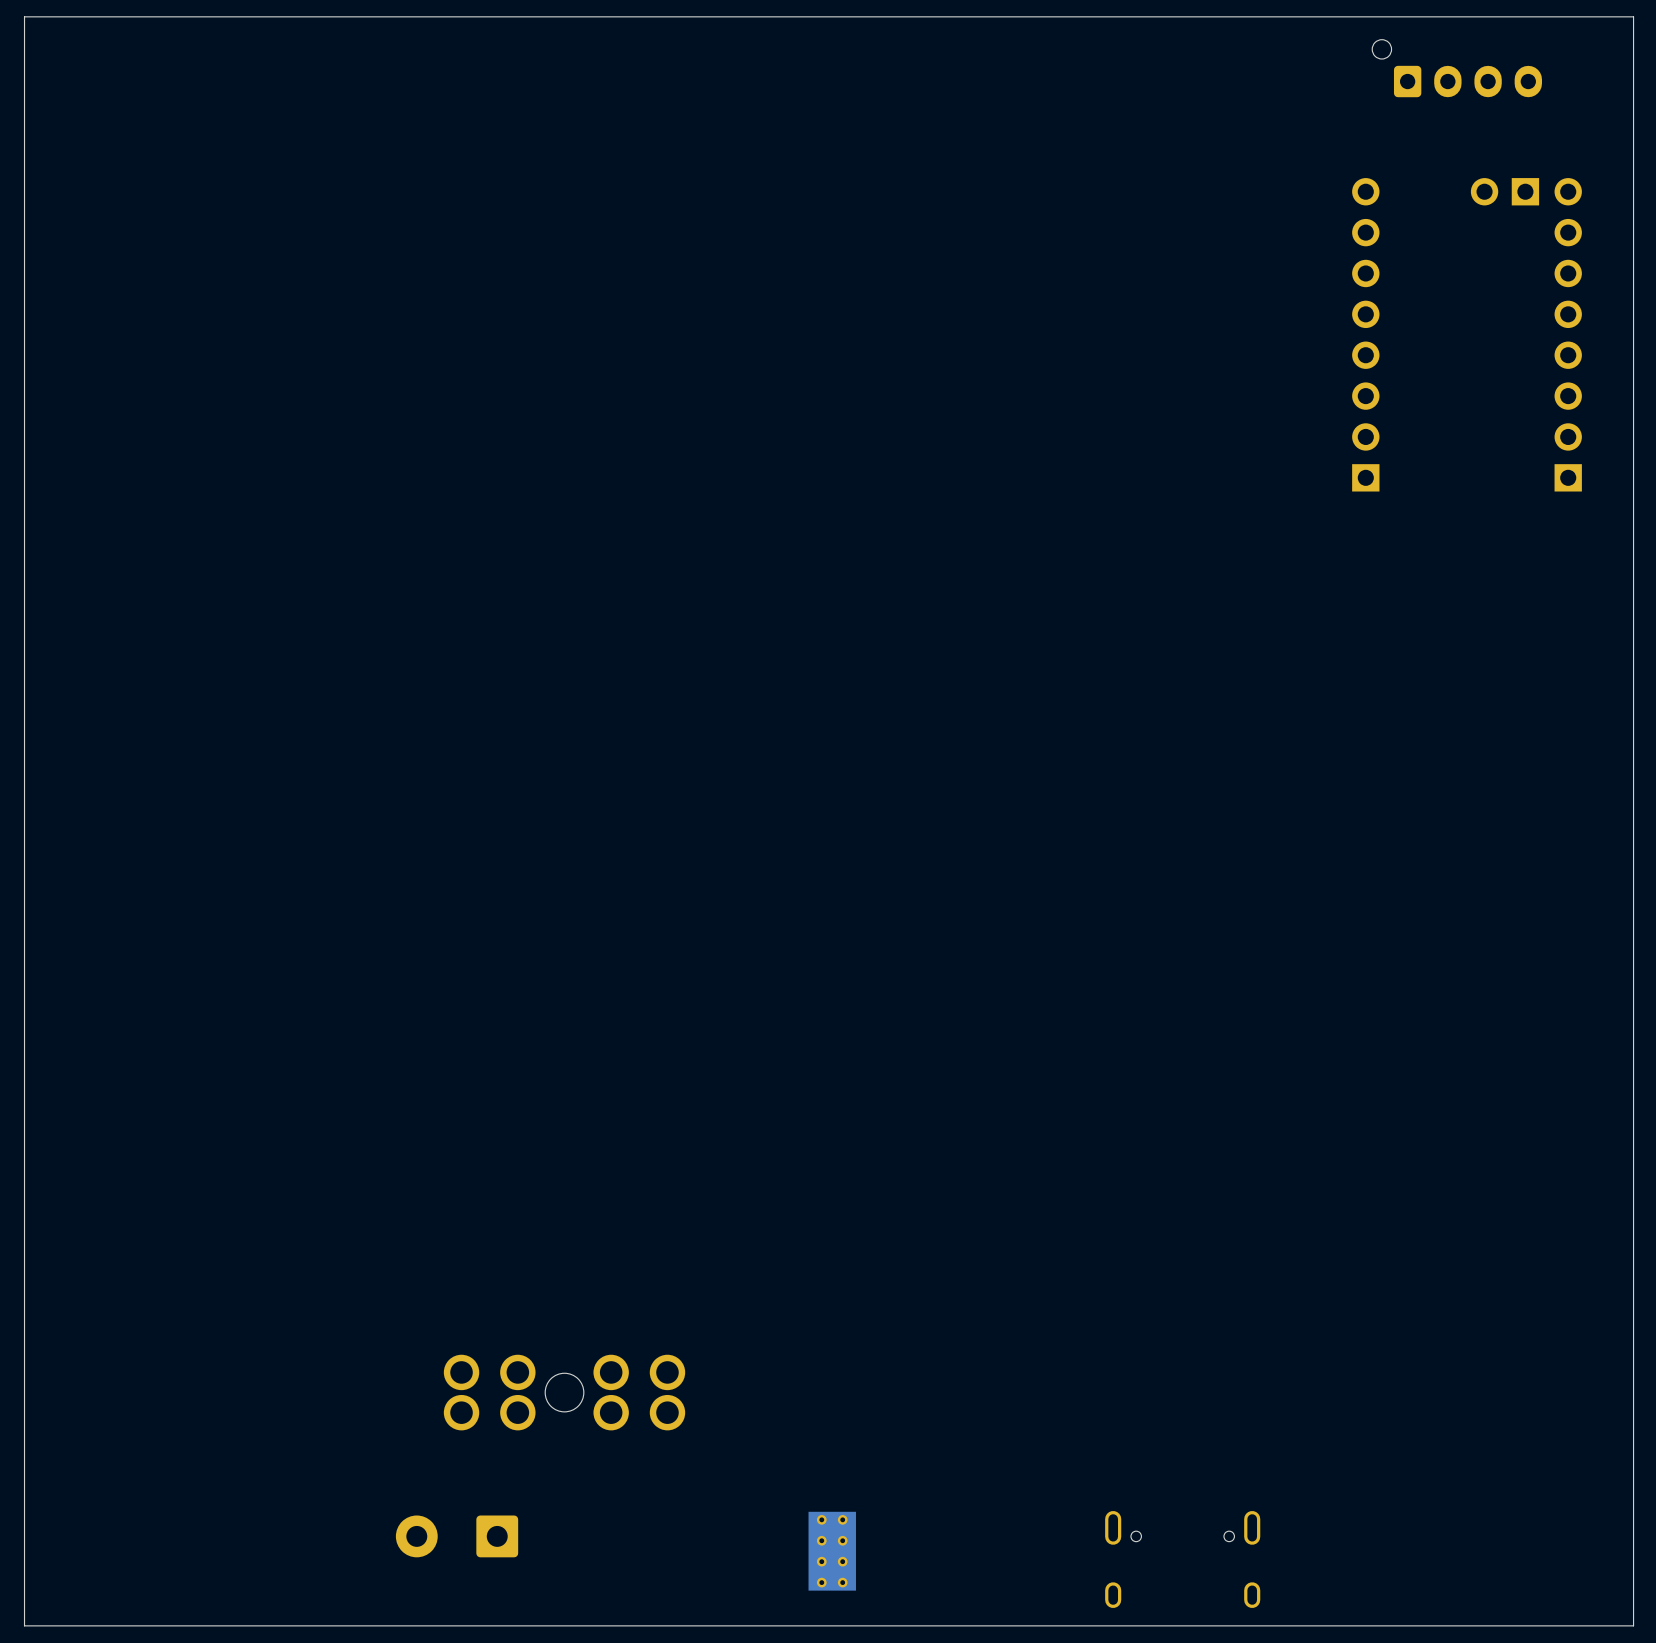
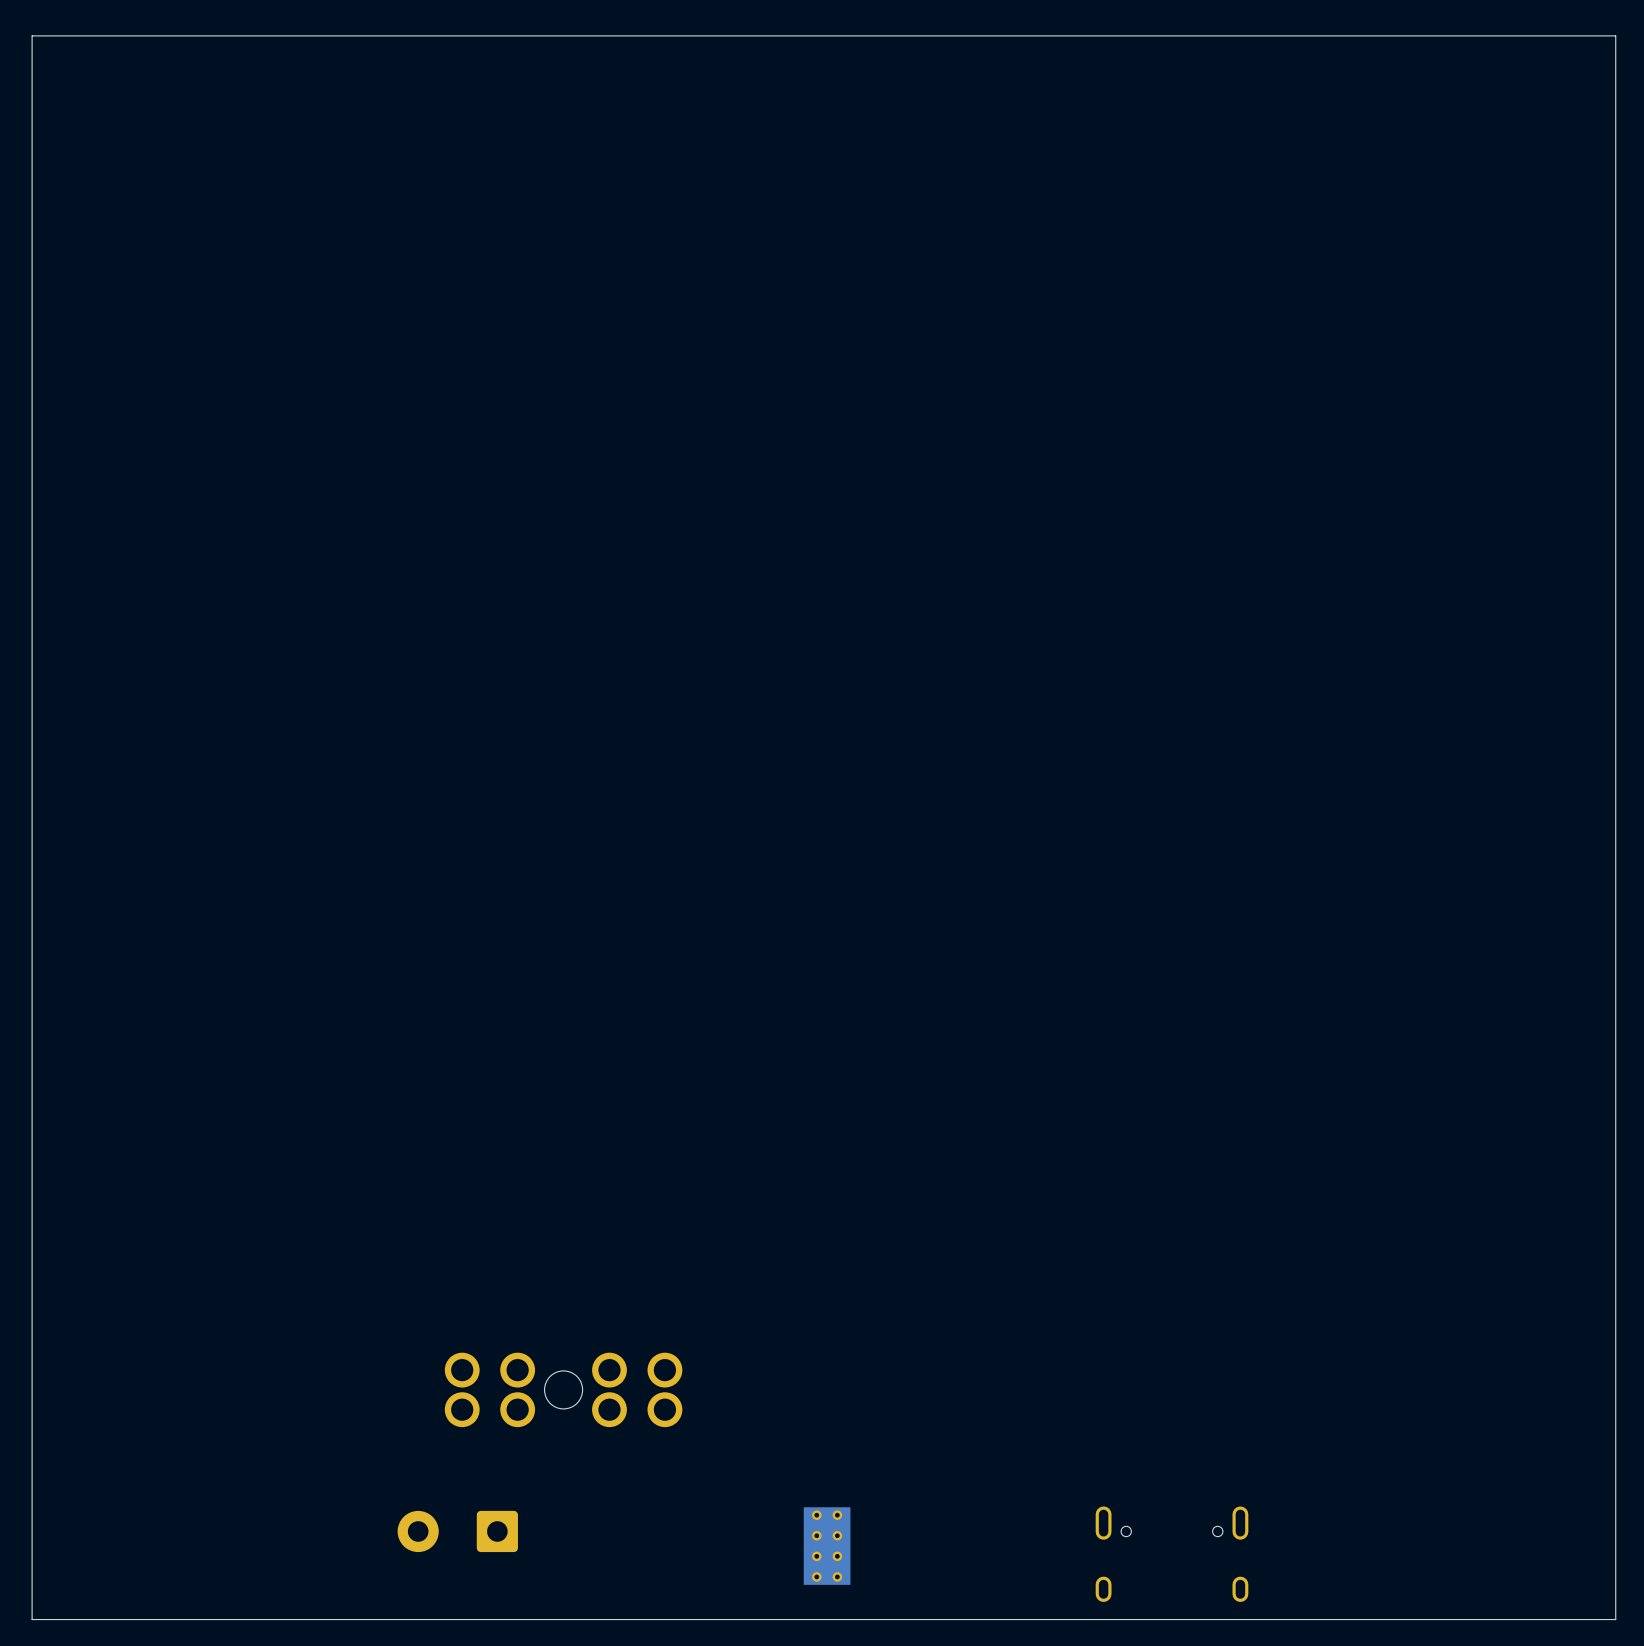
part: (1457, 68) -> none
part: (1504, 191) -> none
part: (1365, 334) -> none
part: (1568, 334) -> none

